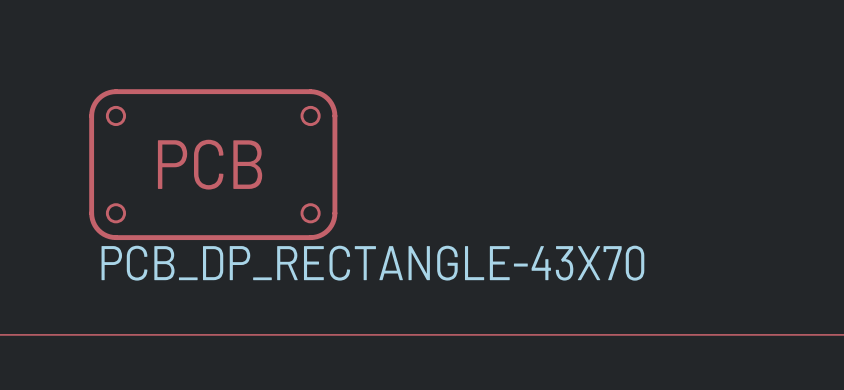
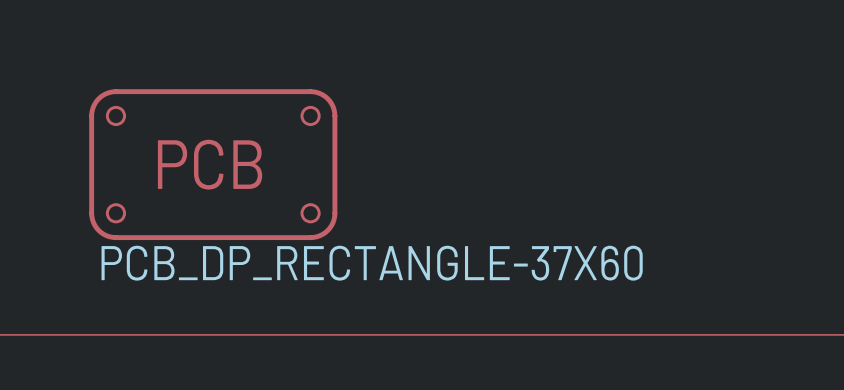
part value: PCB_DP_RECTANGLE-43X70 (372, 263) -> PCB_DP_RECTANGLE-37X60 (372, 263)

